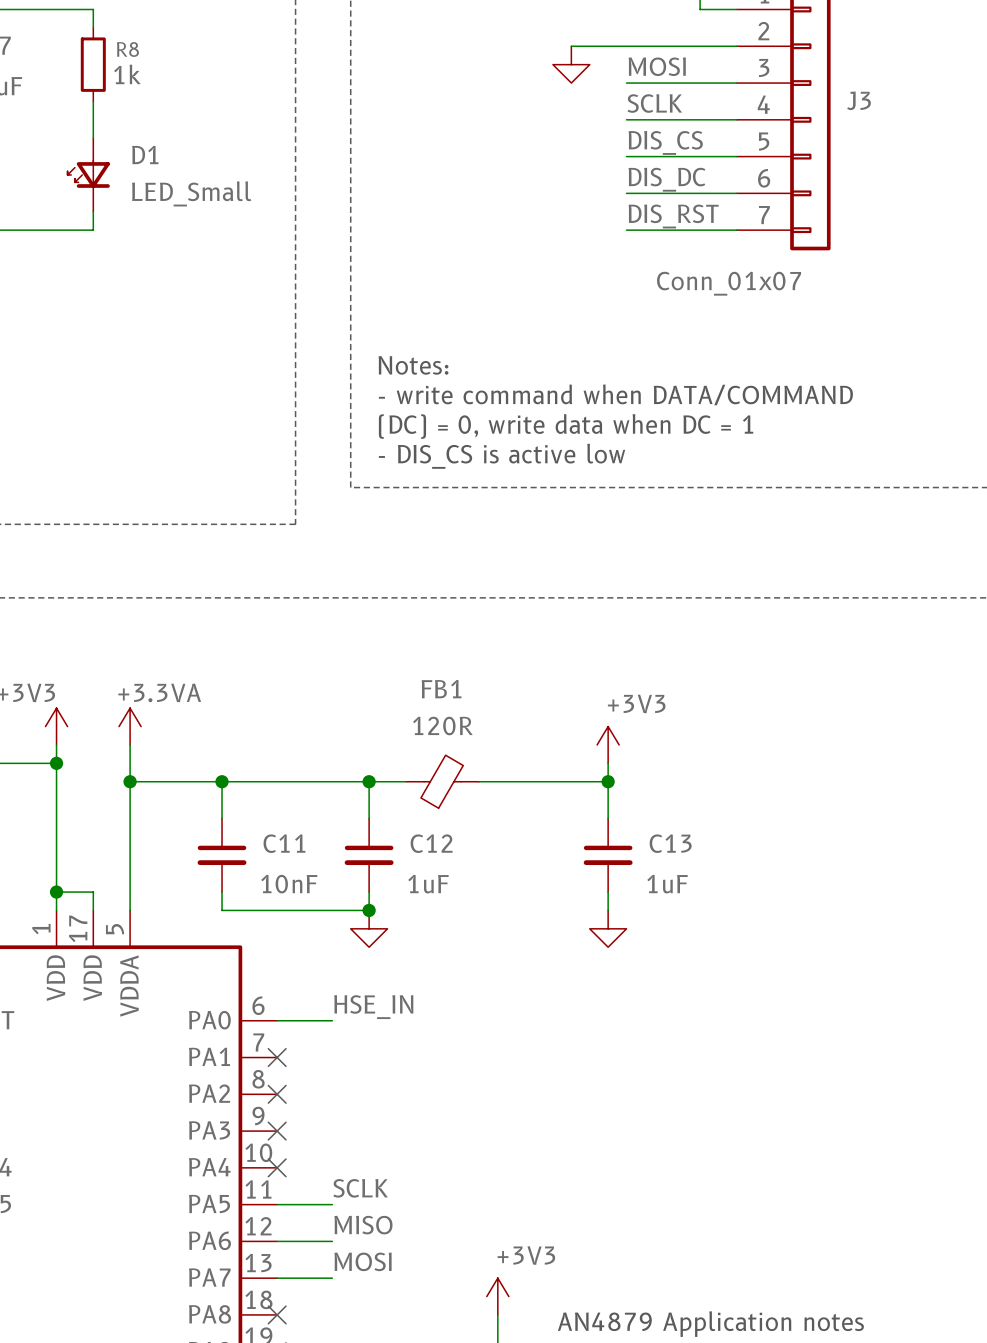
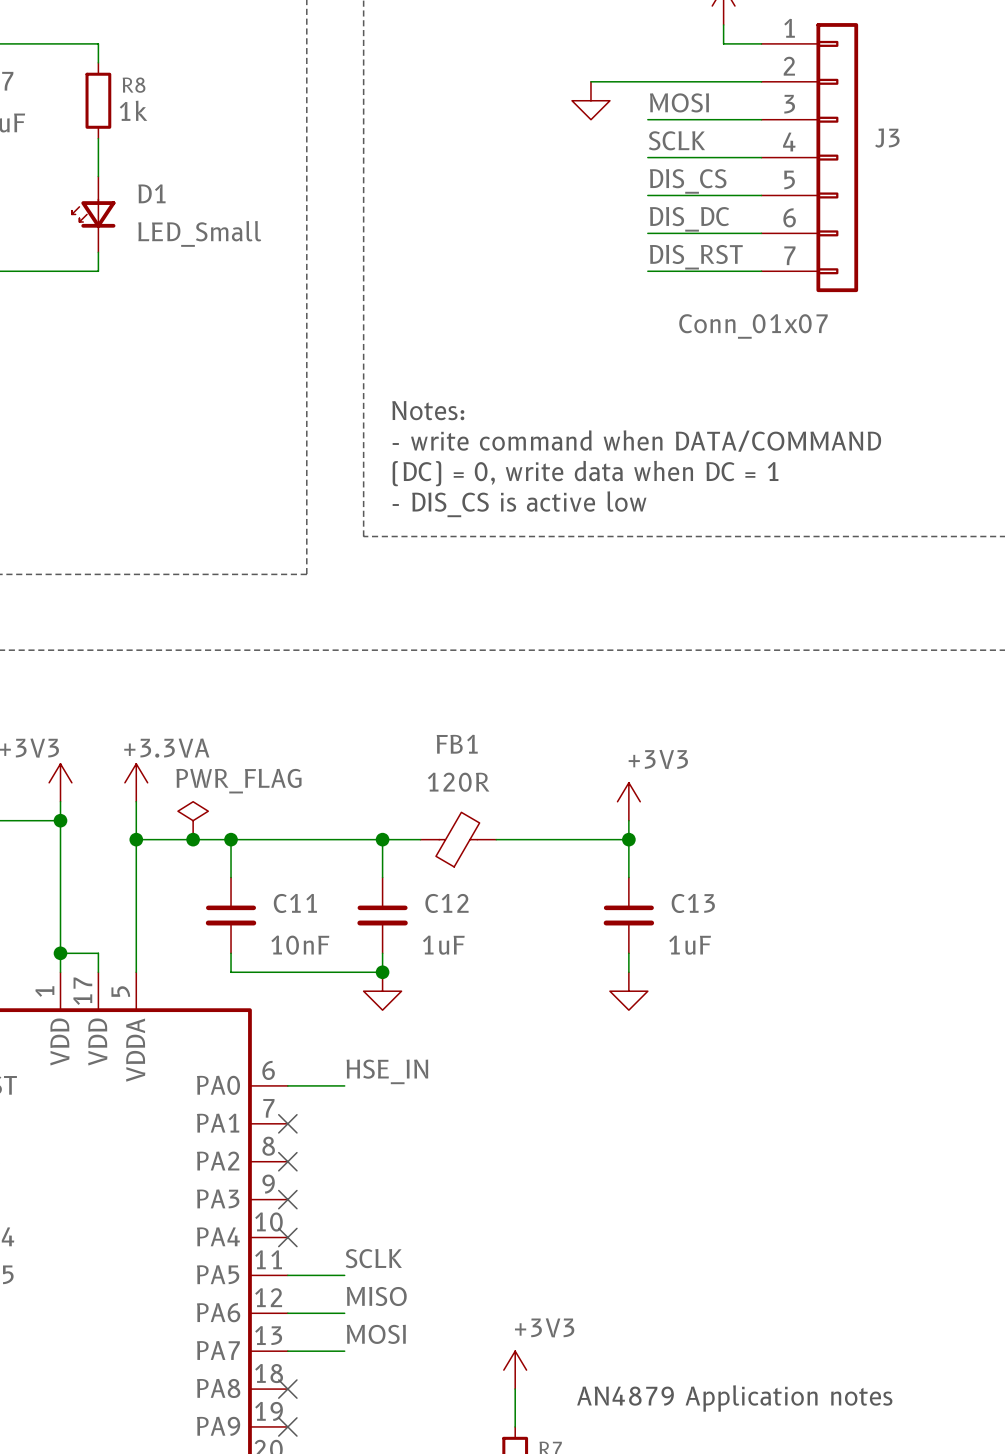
power symbol: none -> PWR_FLAG (193, 820)
junction: none -> (193, 839)

